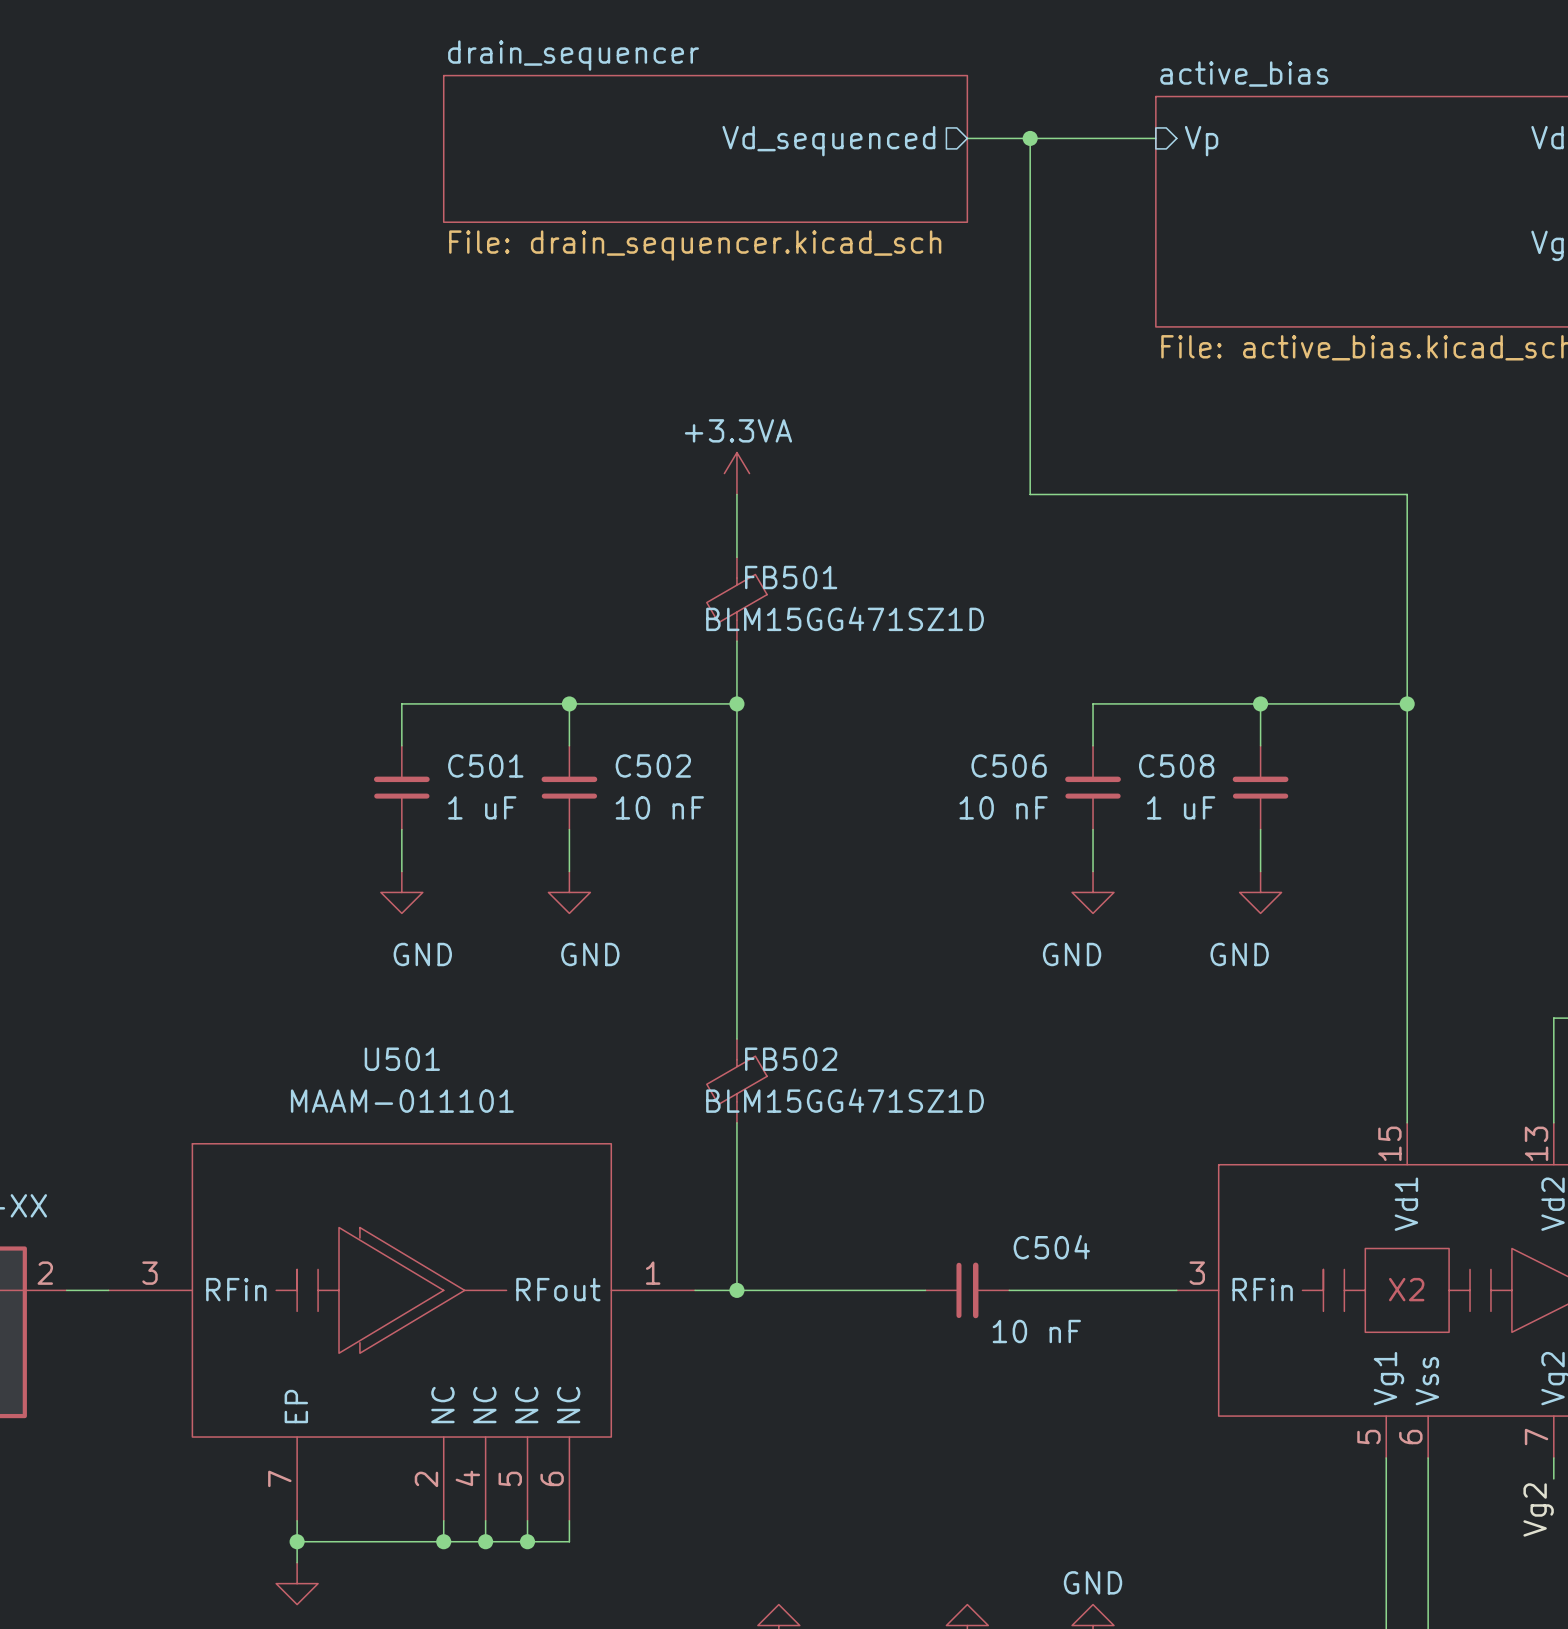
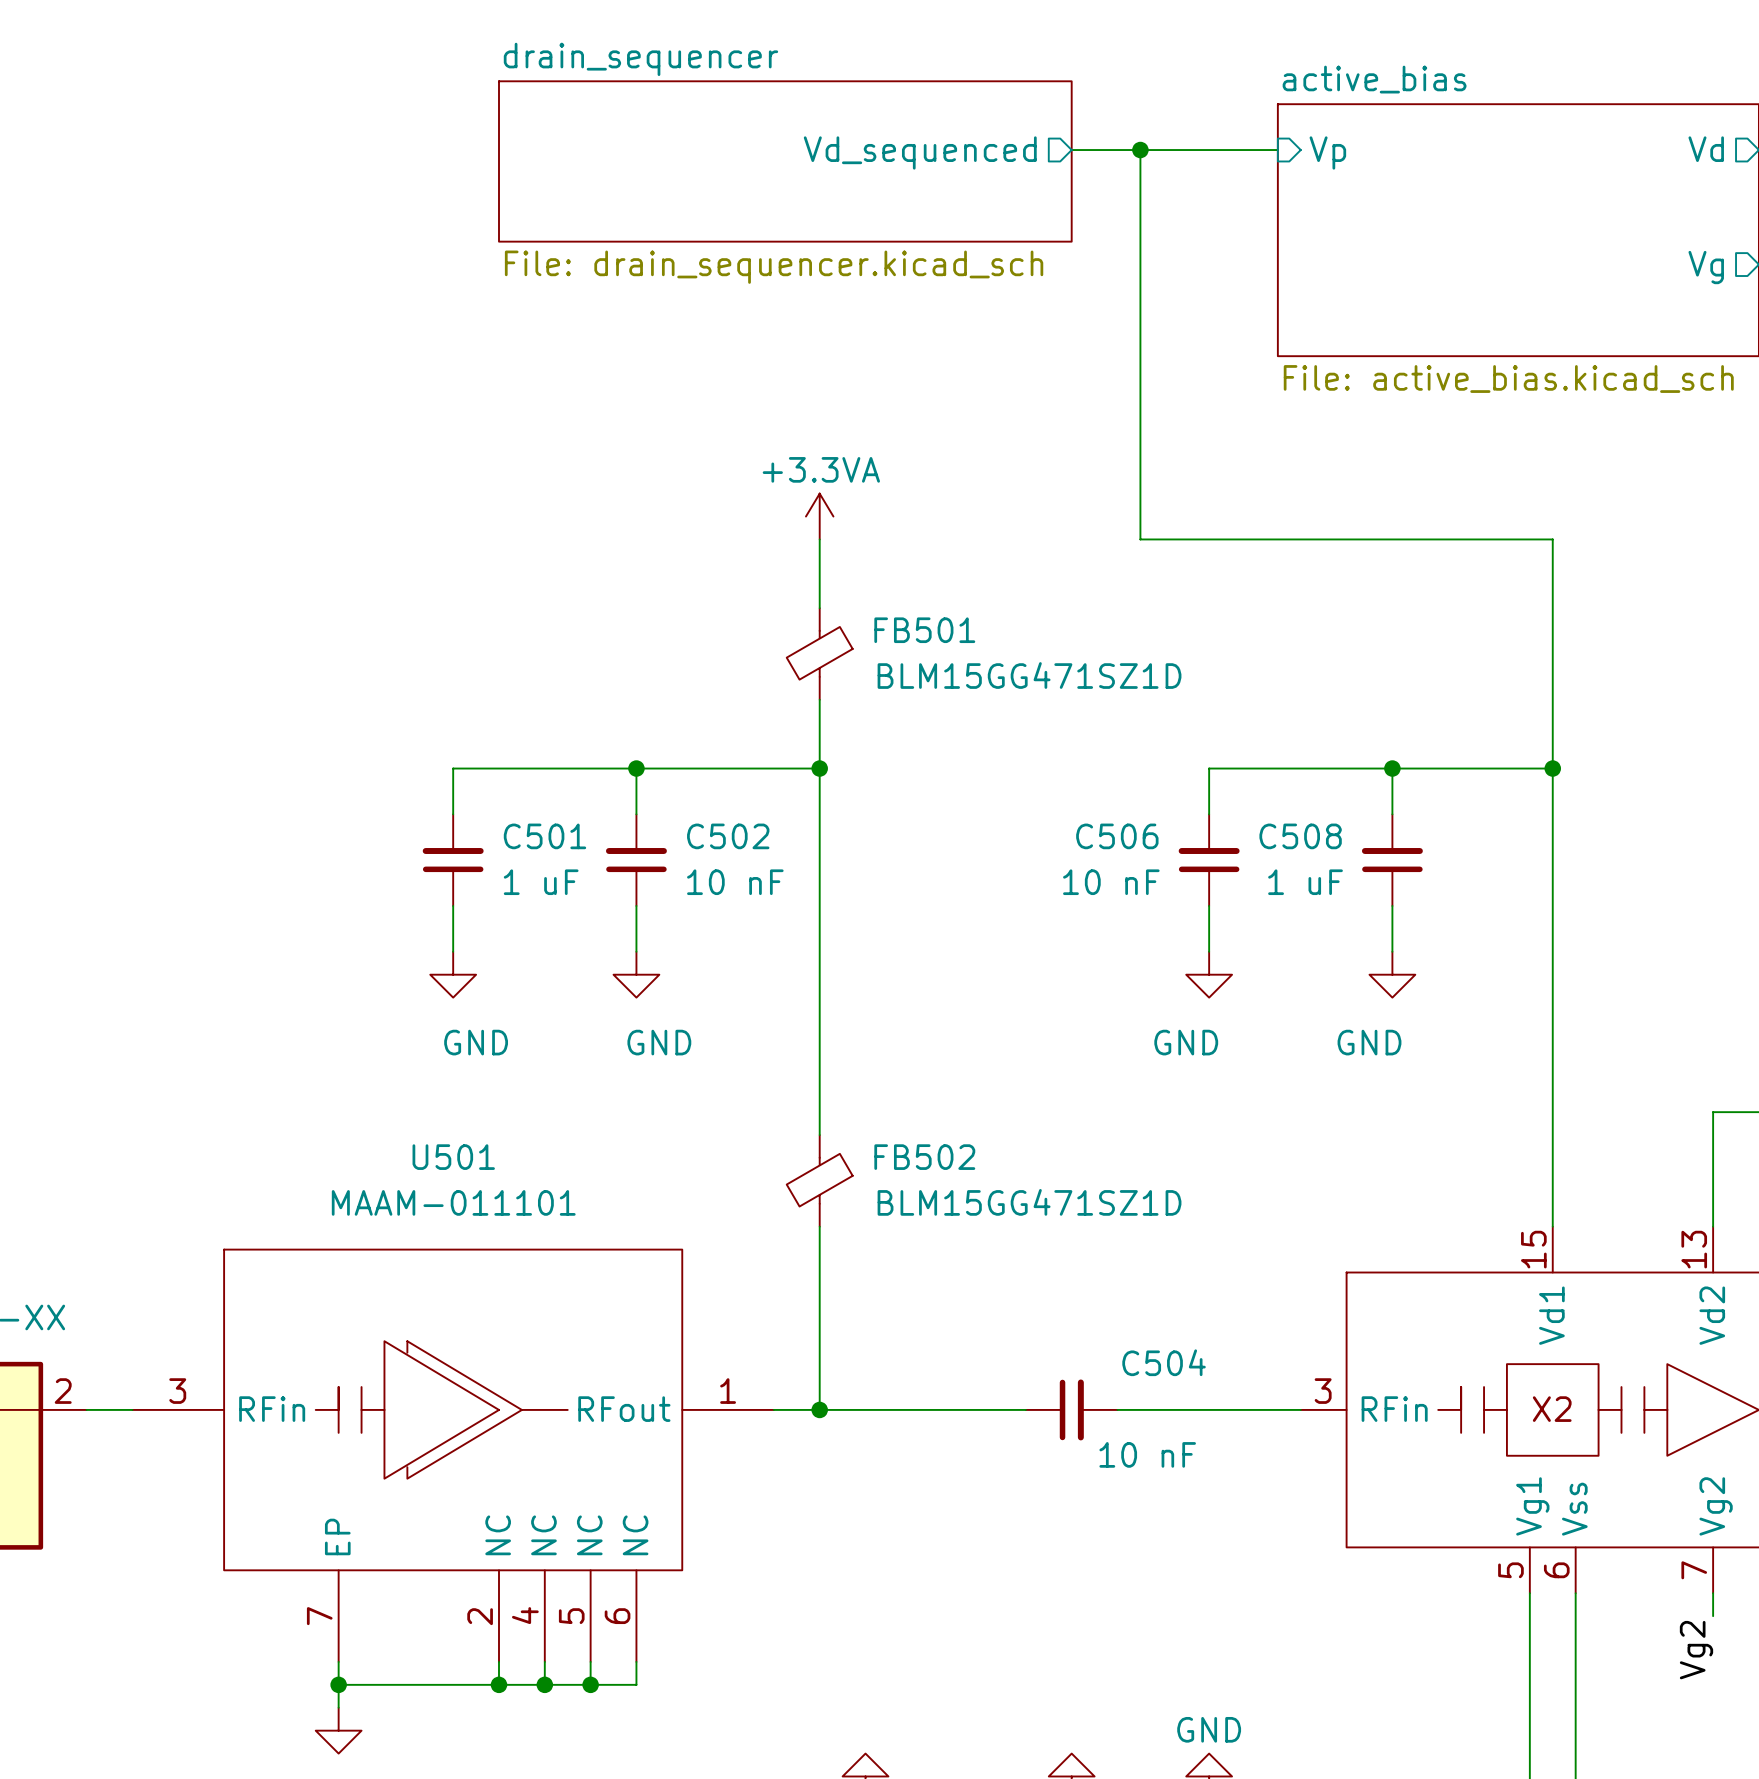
FB501 name position: FB501 (791, 577) -> FB501 (924, 630)
FB501 value position: BLM15GG471SZ1D (845, 618) -> BLM15GG471SZ1D (1029, 675)
FB502 name position: FB502 (791, 1059) -> FB502 (924, 1157)
FB502 value position: BLM15GG471SZ1D (845, 1100) -> BLM15GG471SZ1D (1029, 1202)

